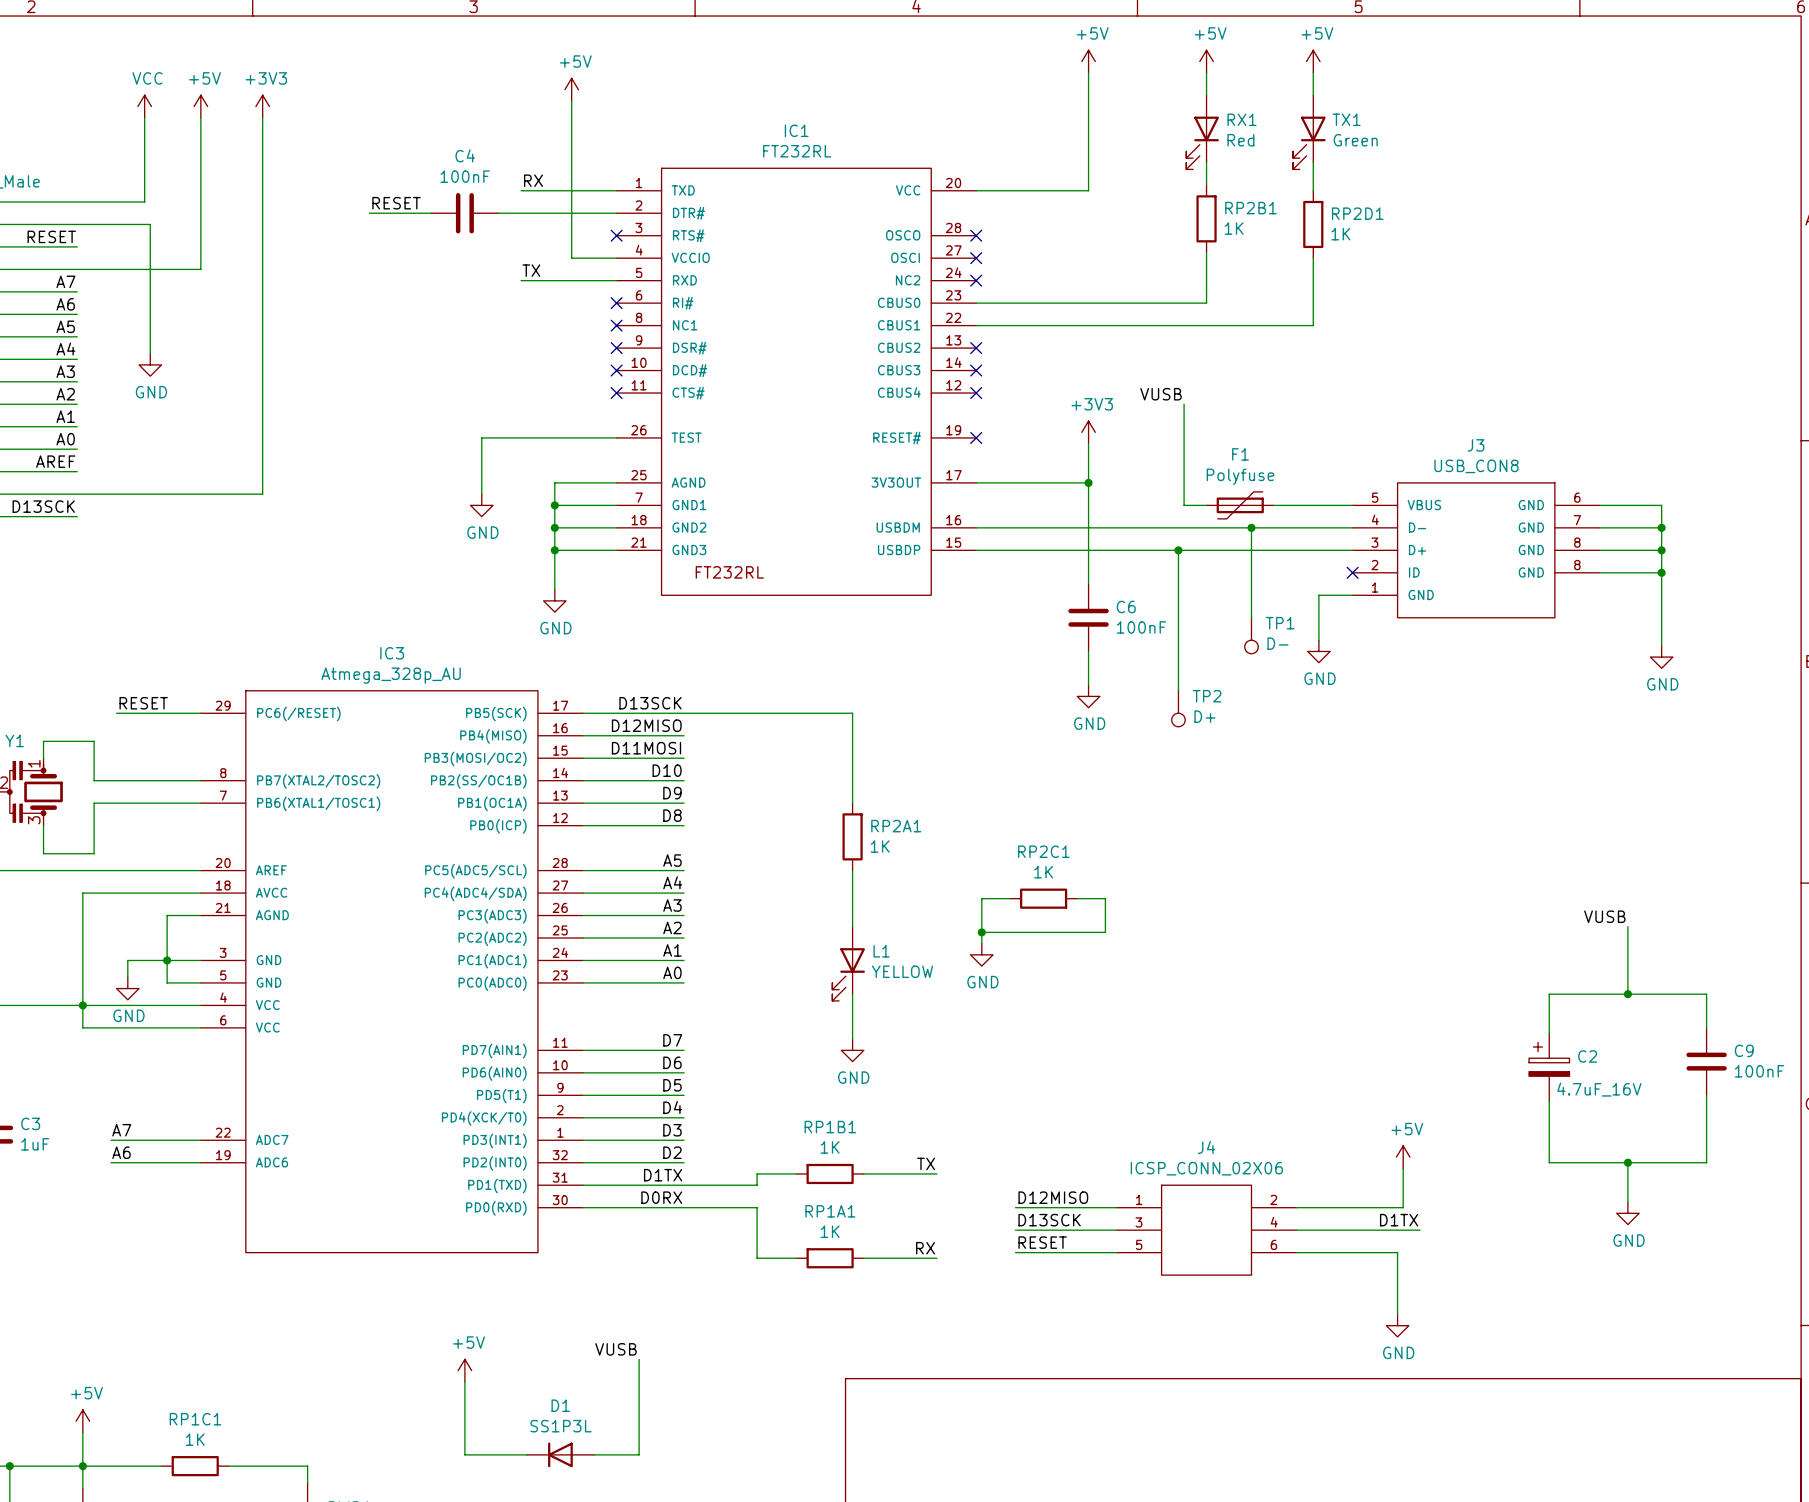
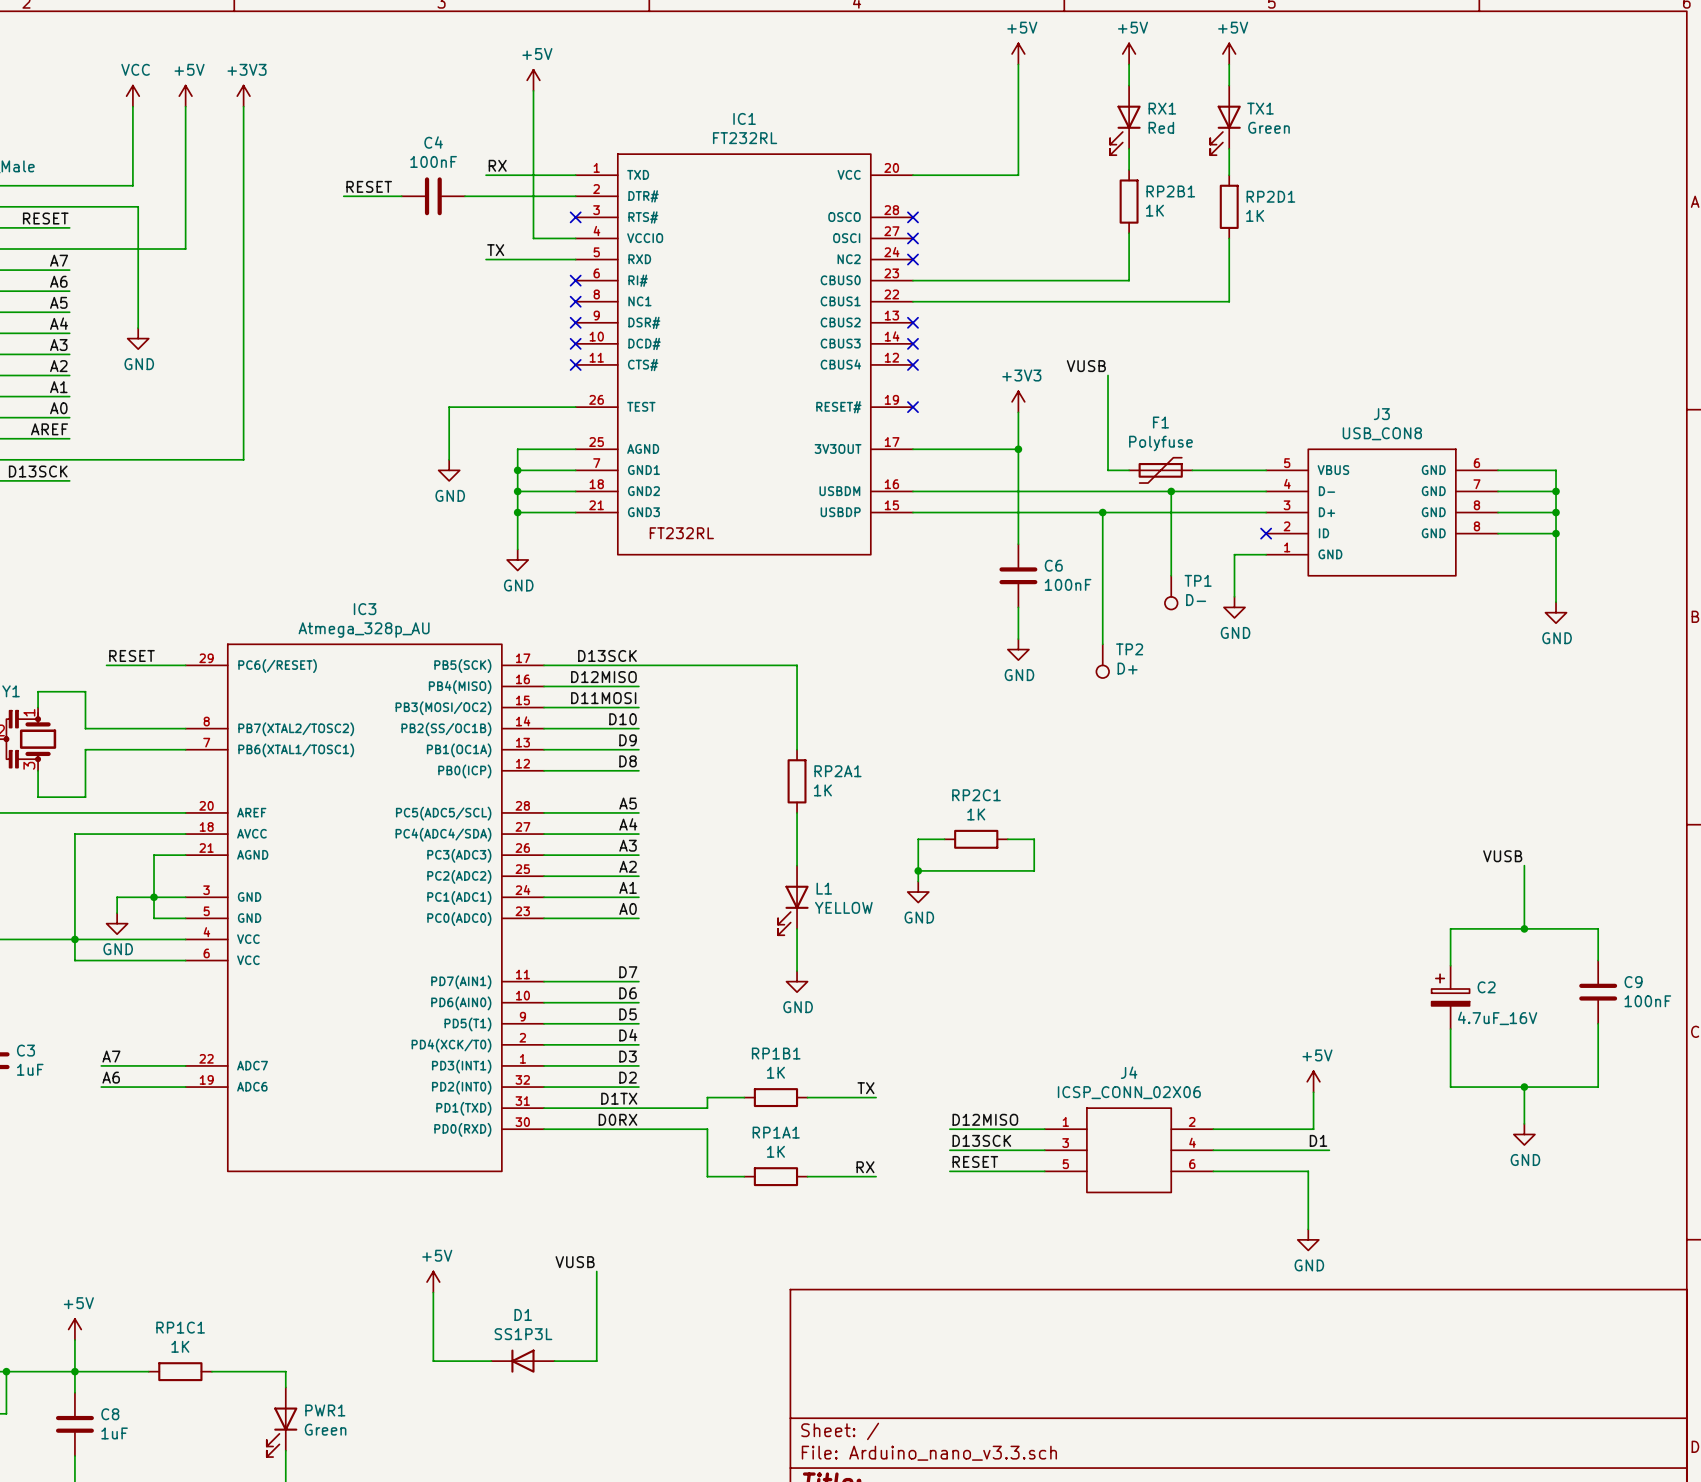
label: D1TX (1399, 1220) -> D1 (1318, 1140)

